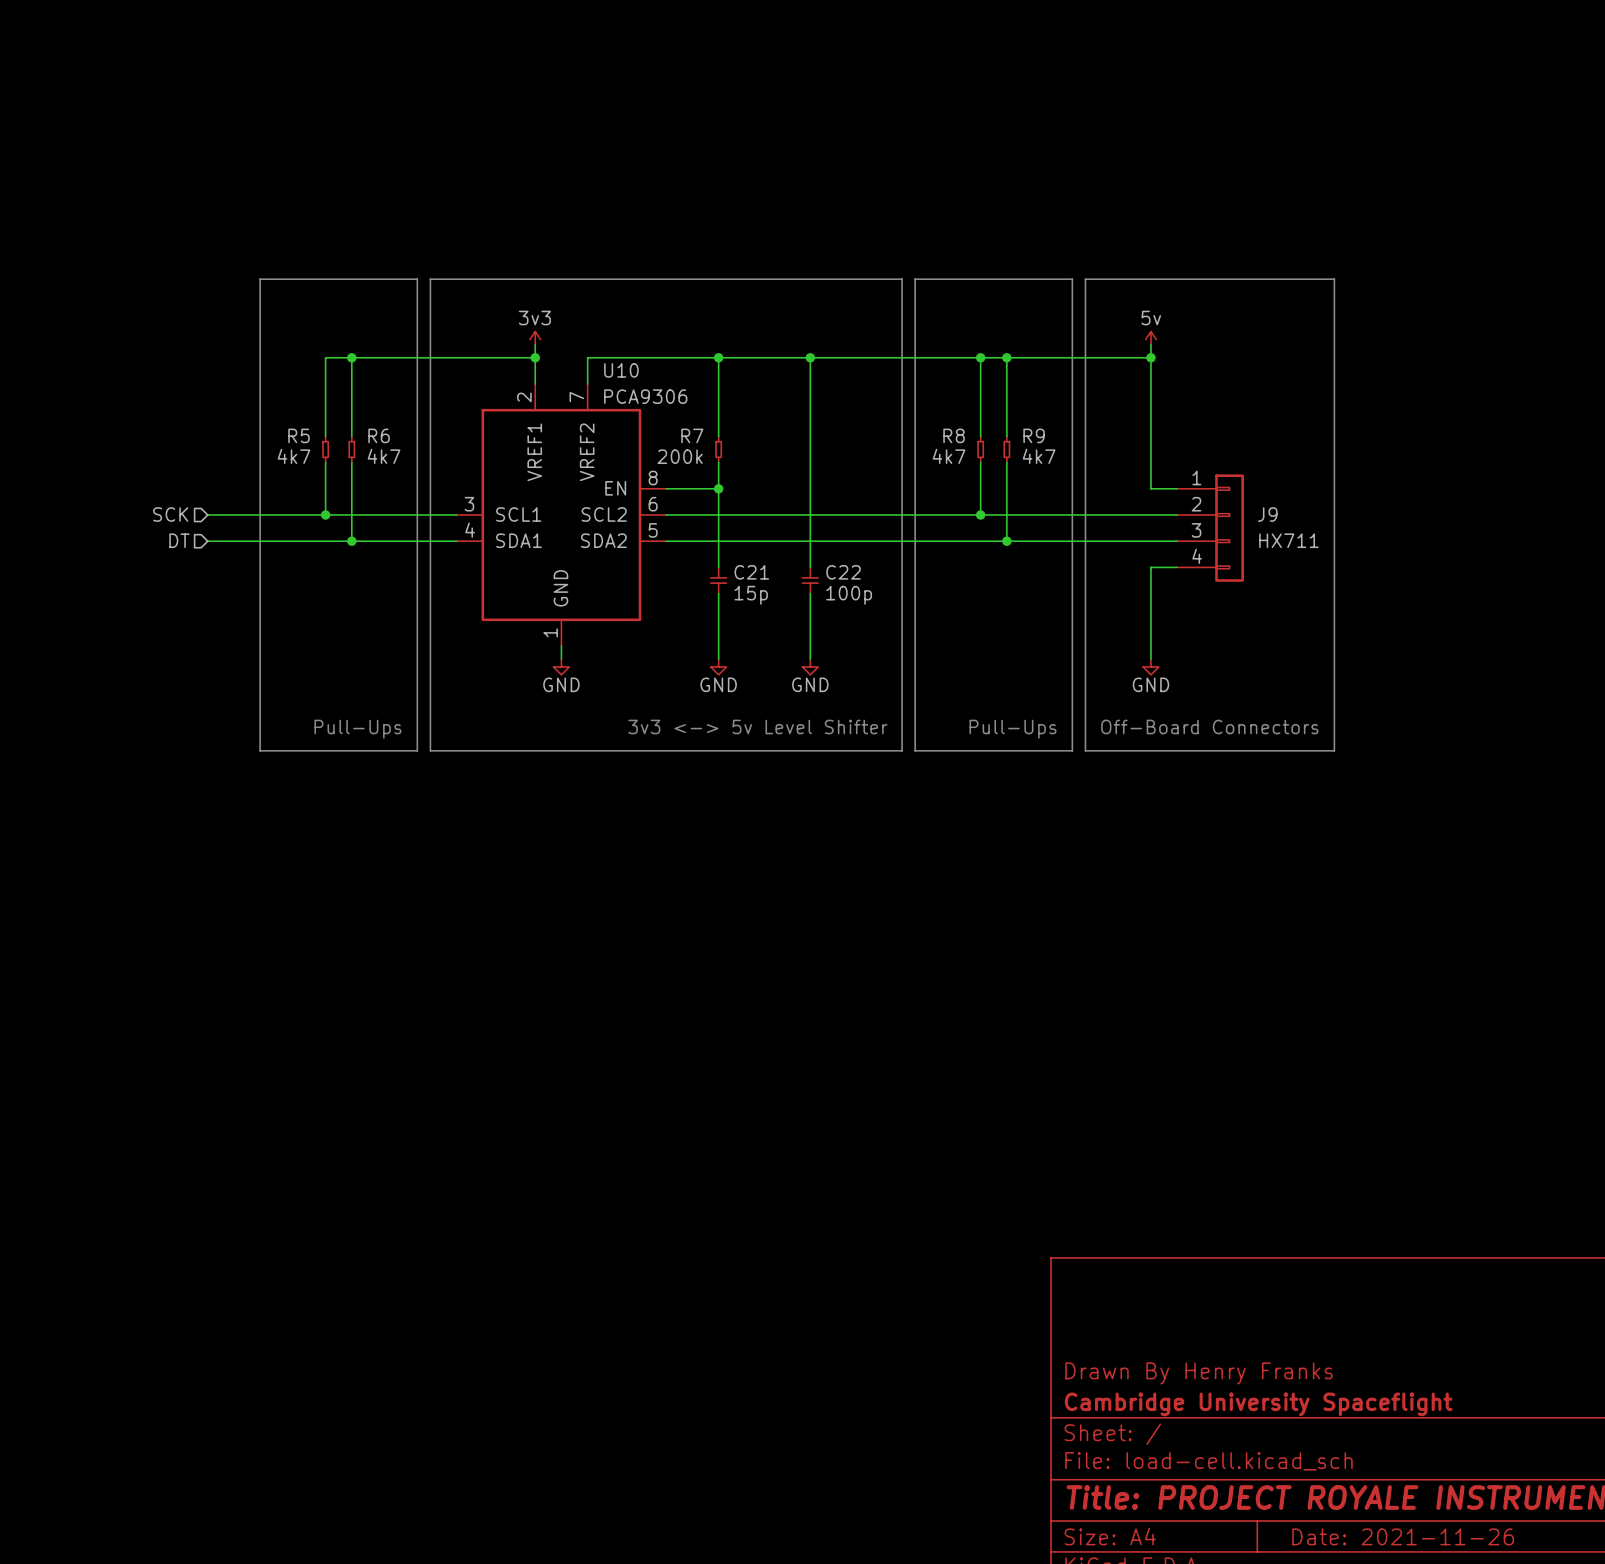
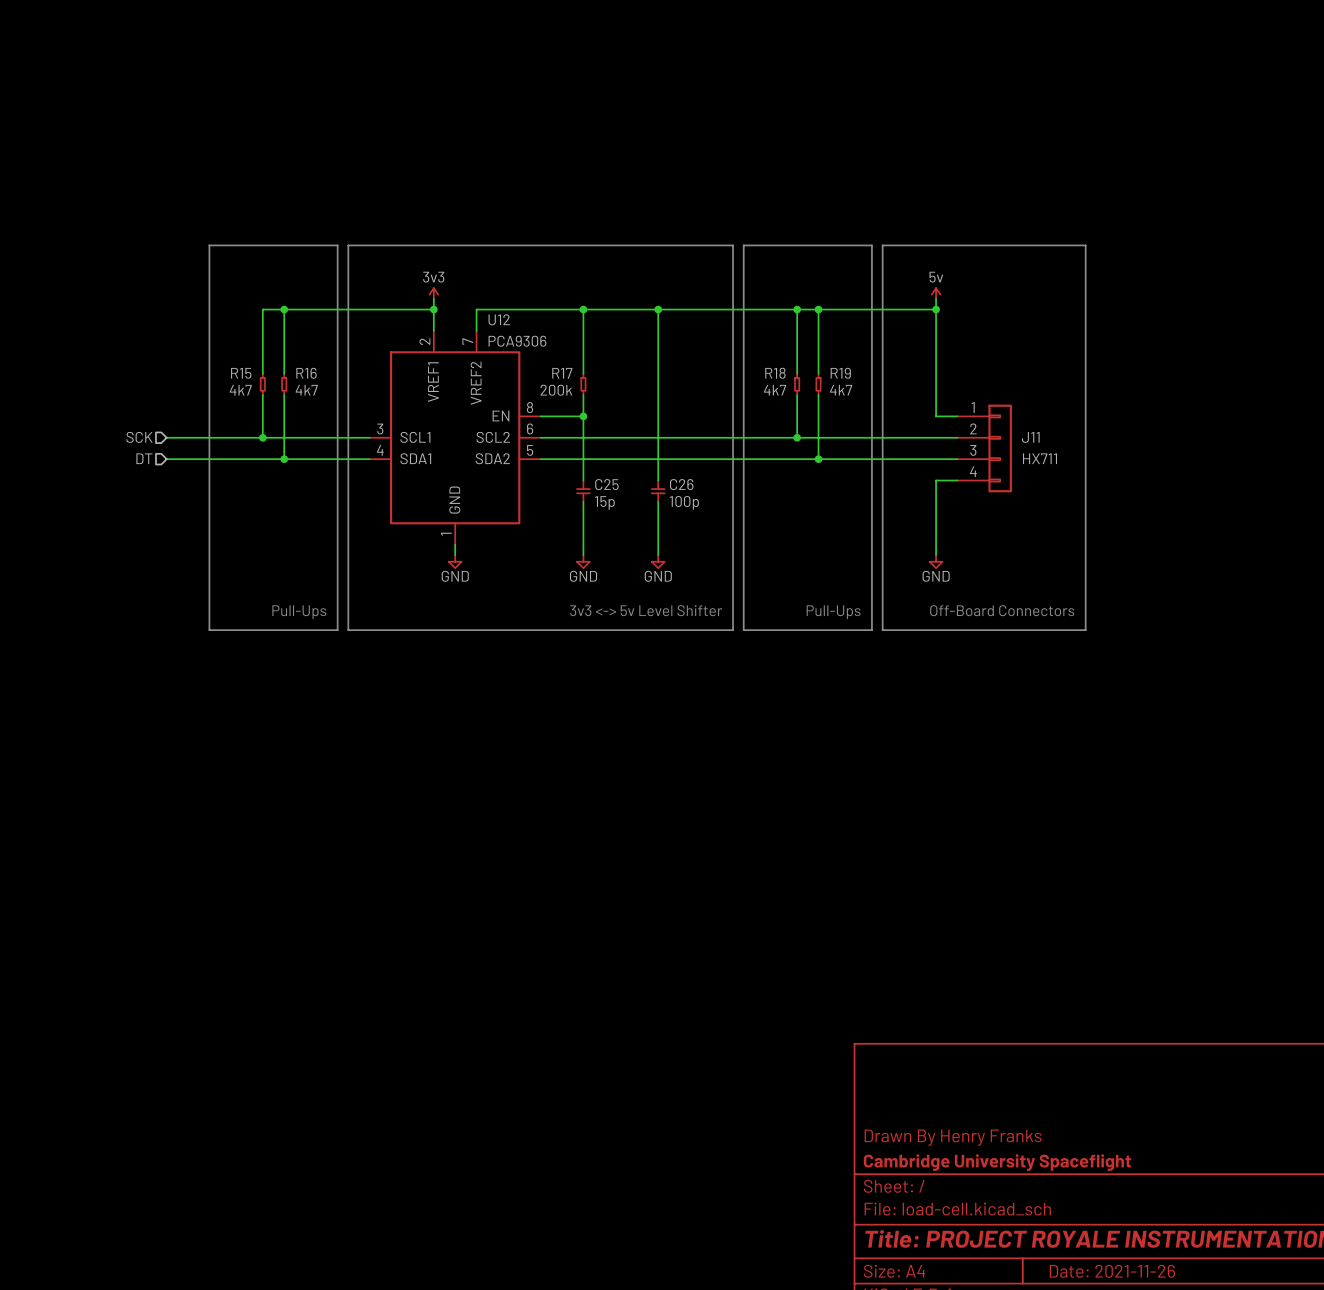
U10 name: U10 (621, 370) -> U12 (499, 319)
R5 name: R5 (299, 435) -> R15 (241, 373)
R6 name: R6 (379, 435) -> R16 (306, 373)
R7 name: R7 (692, 435) -> R17 (562, 373)
R8 name: R8 (954, 435) -> R18 (775, 373)
R9 name: R9 (1034, 435) -> R19 (840, 373)
J9 name: J9 (1267, 514) -> J11 (1030, 437)
C21 name: C21 (751, 572) -> C25 (606, 484)
C22 name: C22 (843, 572) -> C26 (681, 484)

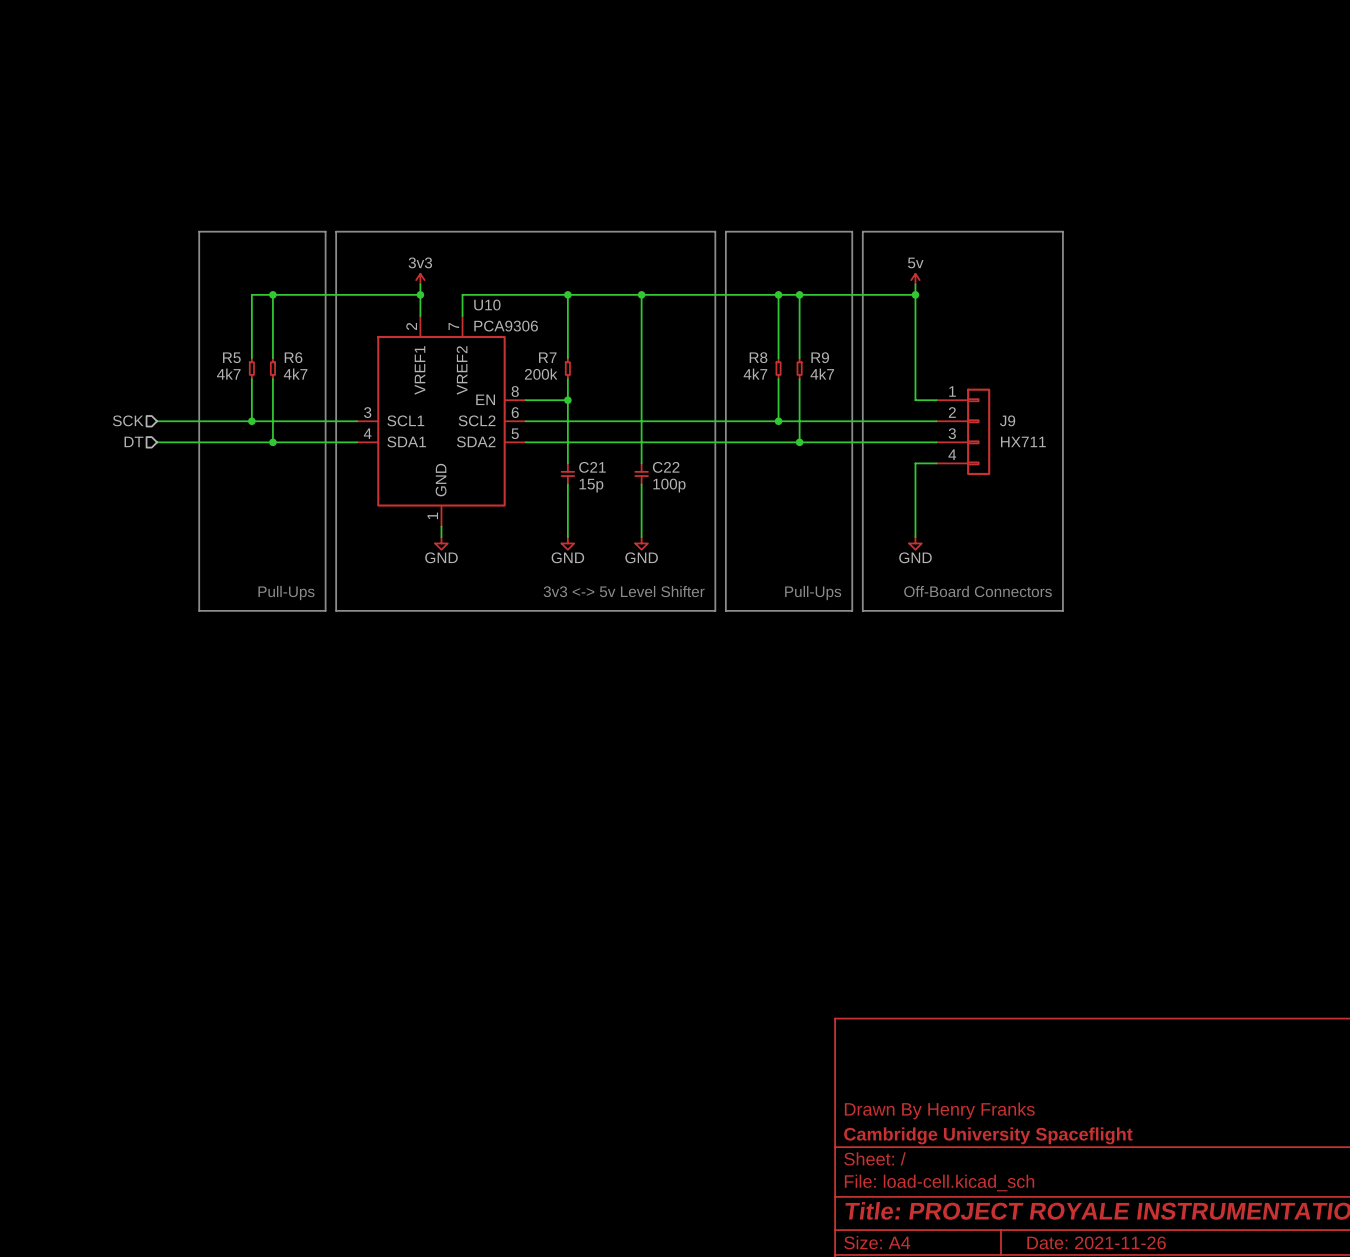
U12 name: U12 (499, 319) -> U10 (487, 305)
R15 name: R15 (241, 373) -> R5 (231, 357)
R16 name: R16 (306, 373) -> R6 (293, 357)
R17 name: R17 (562, 373) -> R7 (547, 357)
R18 name: R18 (775, 373) -> R8 (758, 357)
R19 name: R19 (840, 373) -> R9 (820, 357)
J11 name: J11 (1030, 437) -> J9 (1007, 420)
C25 name: C25 (606, 484) -> C21 (592, 467)
C26 name: C26 (681, 484) -> C22 (666, 467)

